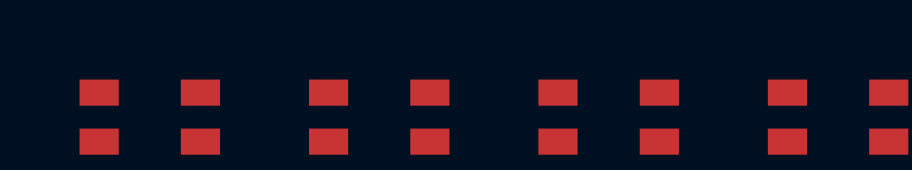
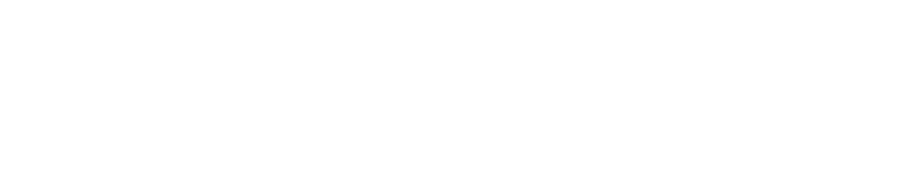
part: (149, 117) -> none
part: (379, 117) -> none
part: (608, 117) -> none
part: (838, 117) -> none

